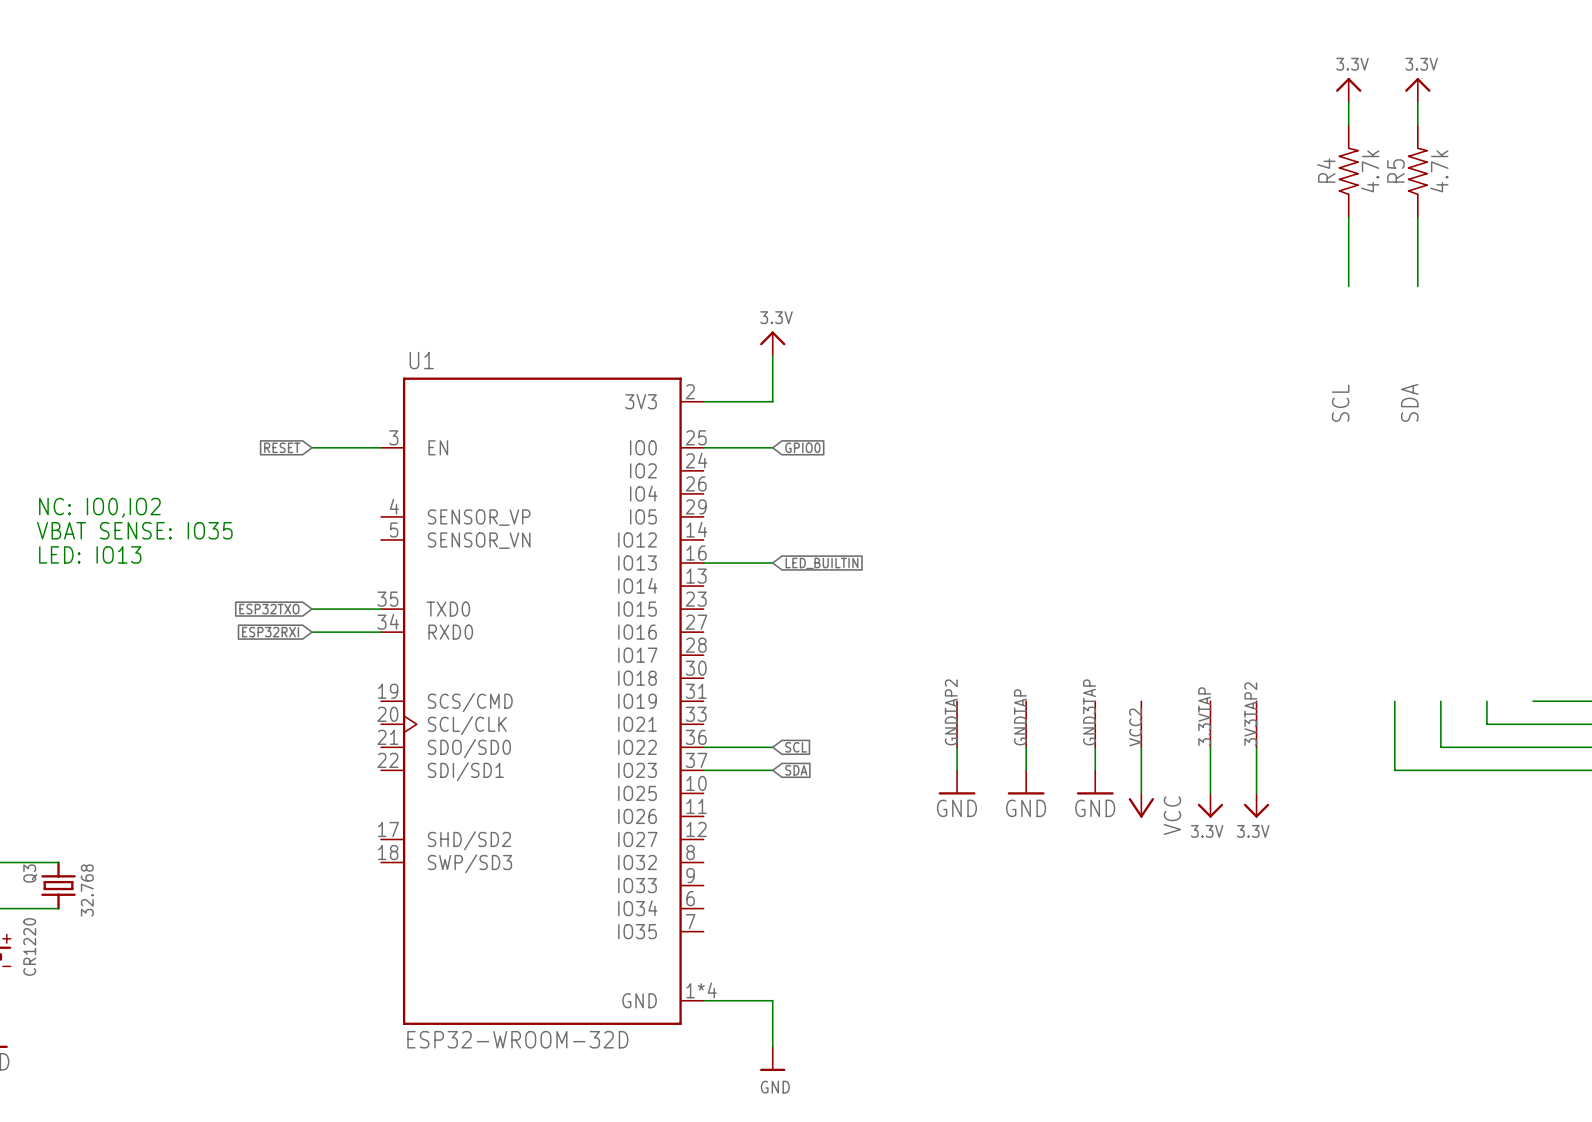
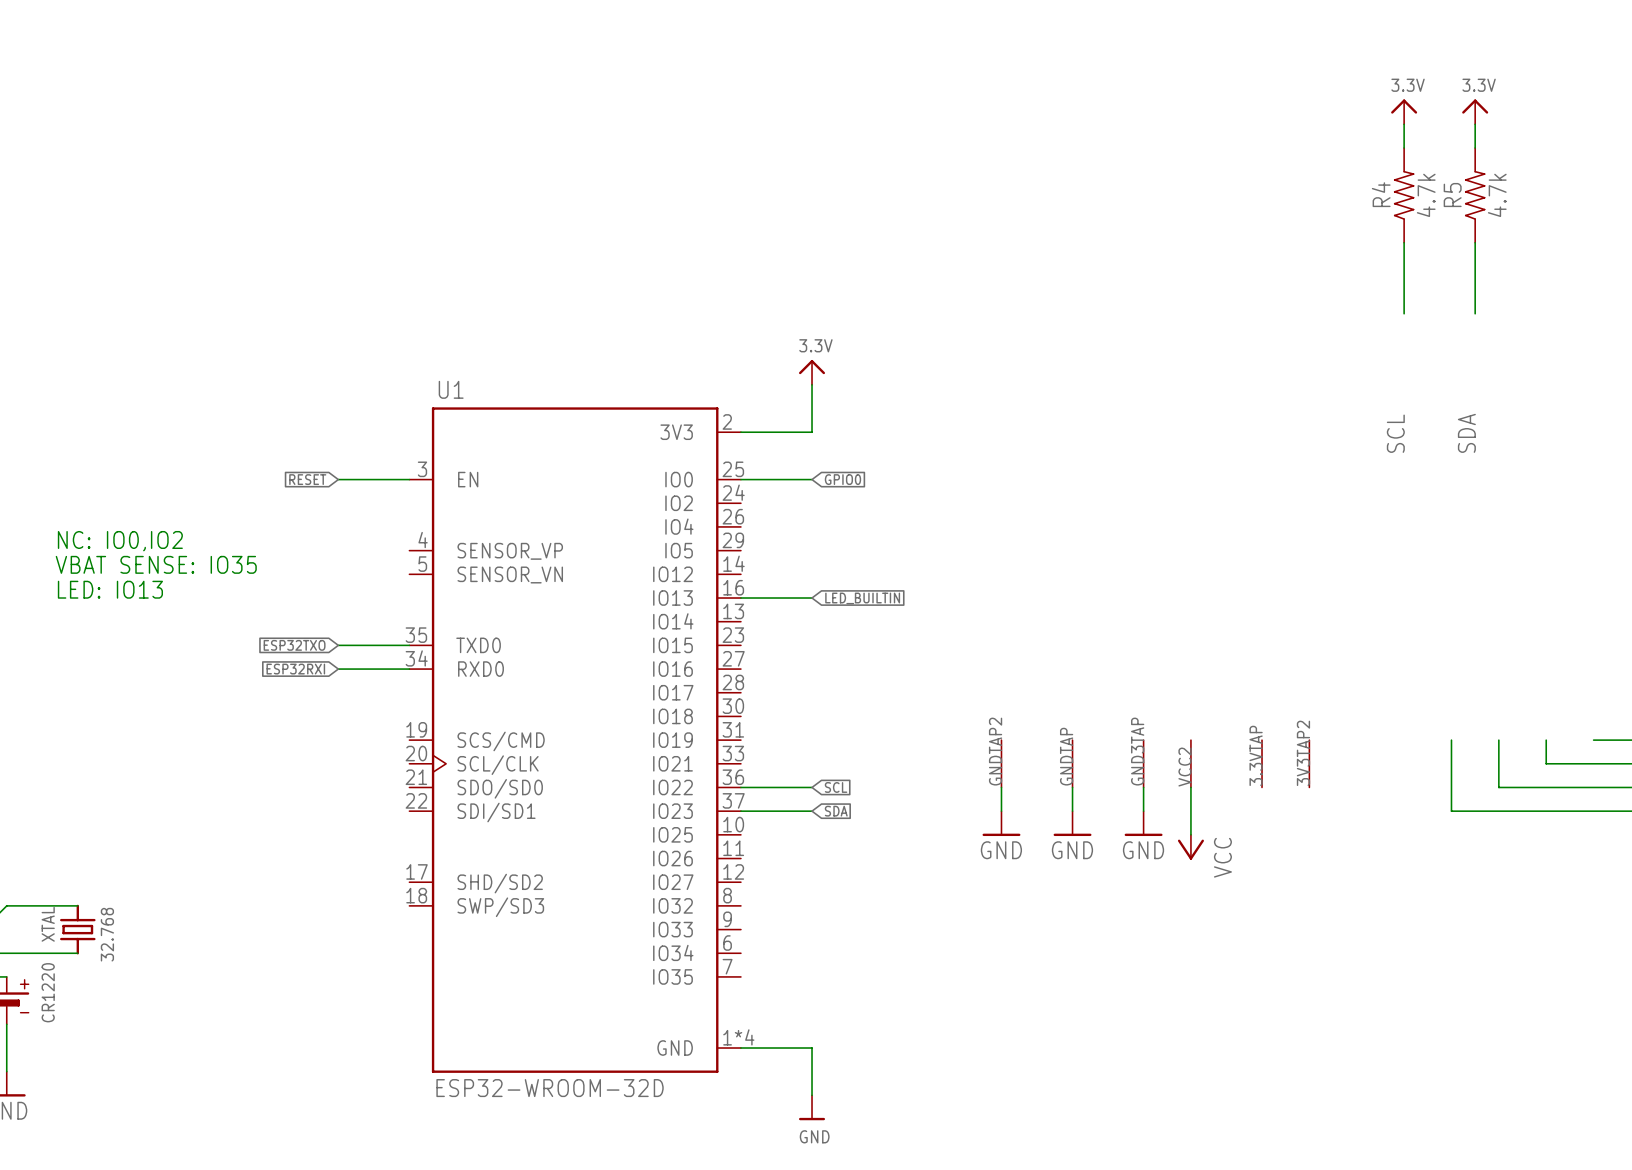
wire: (1210, 747) (1210, 793) -> none
wire: (1256, 747) (1256, 793) -> none
power symbol: 3.3V (1210, 805) -> none
power symbol: 3.3V (1256, 805) -> none
Q3 name: Q3 (30, 873) -> XTAL (48, 924)

